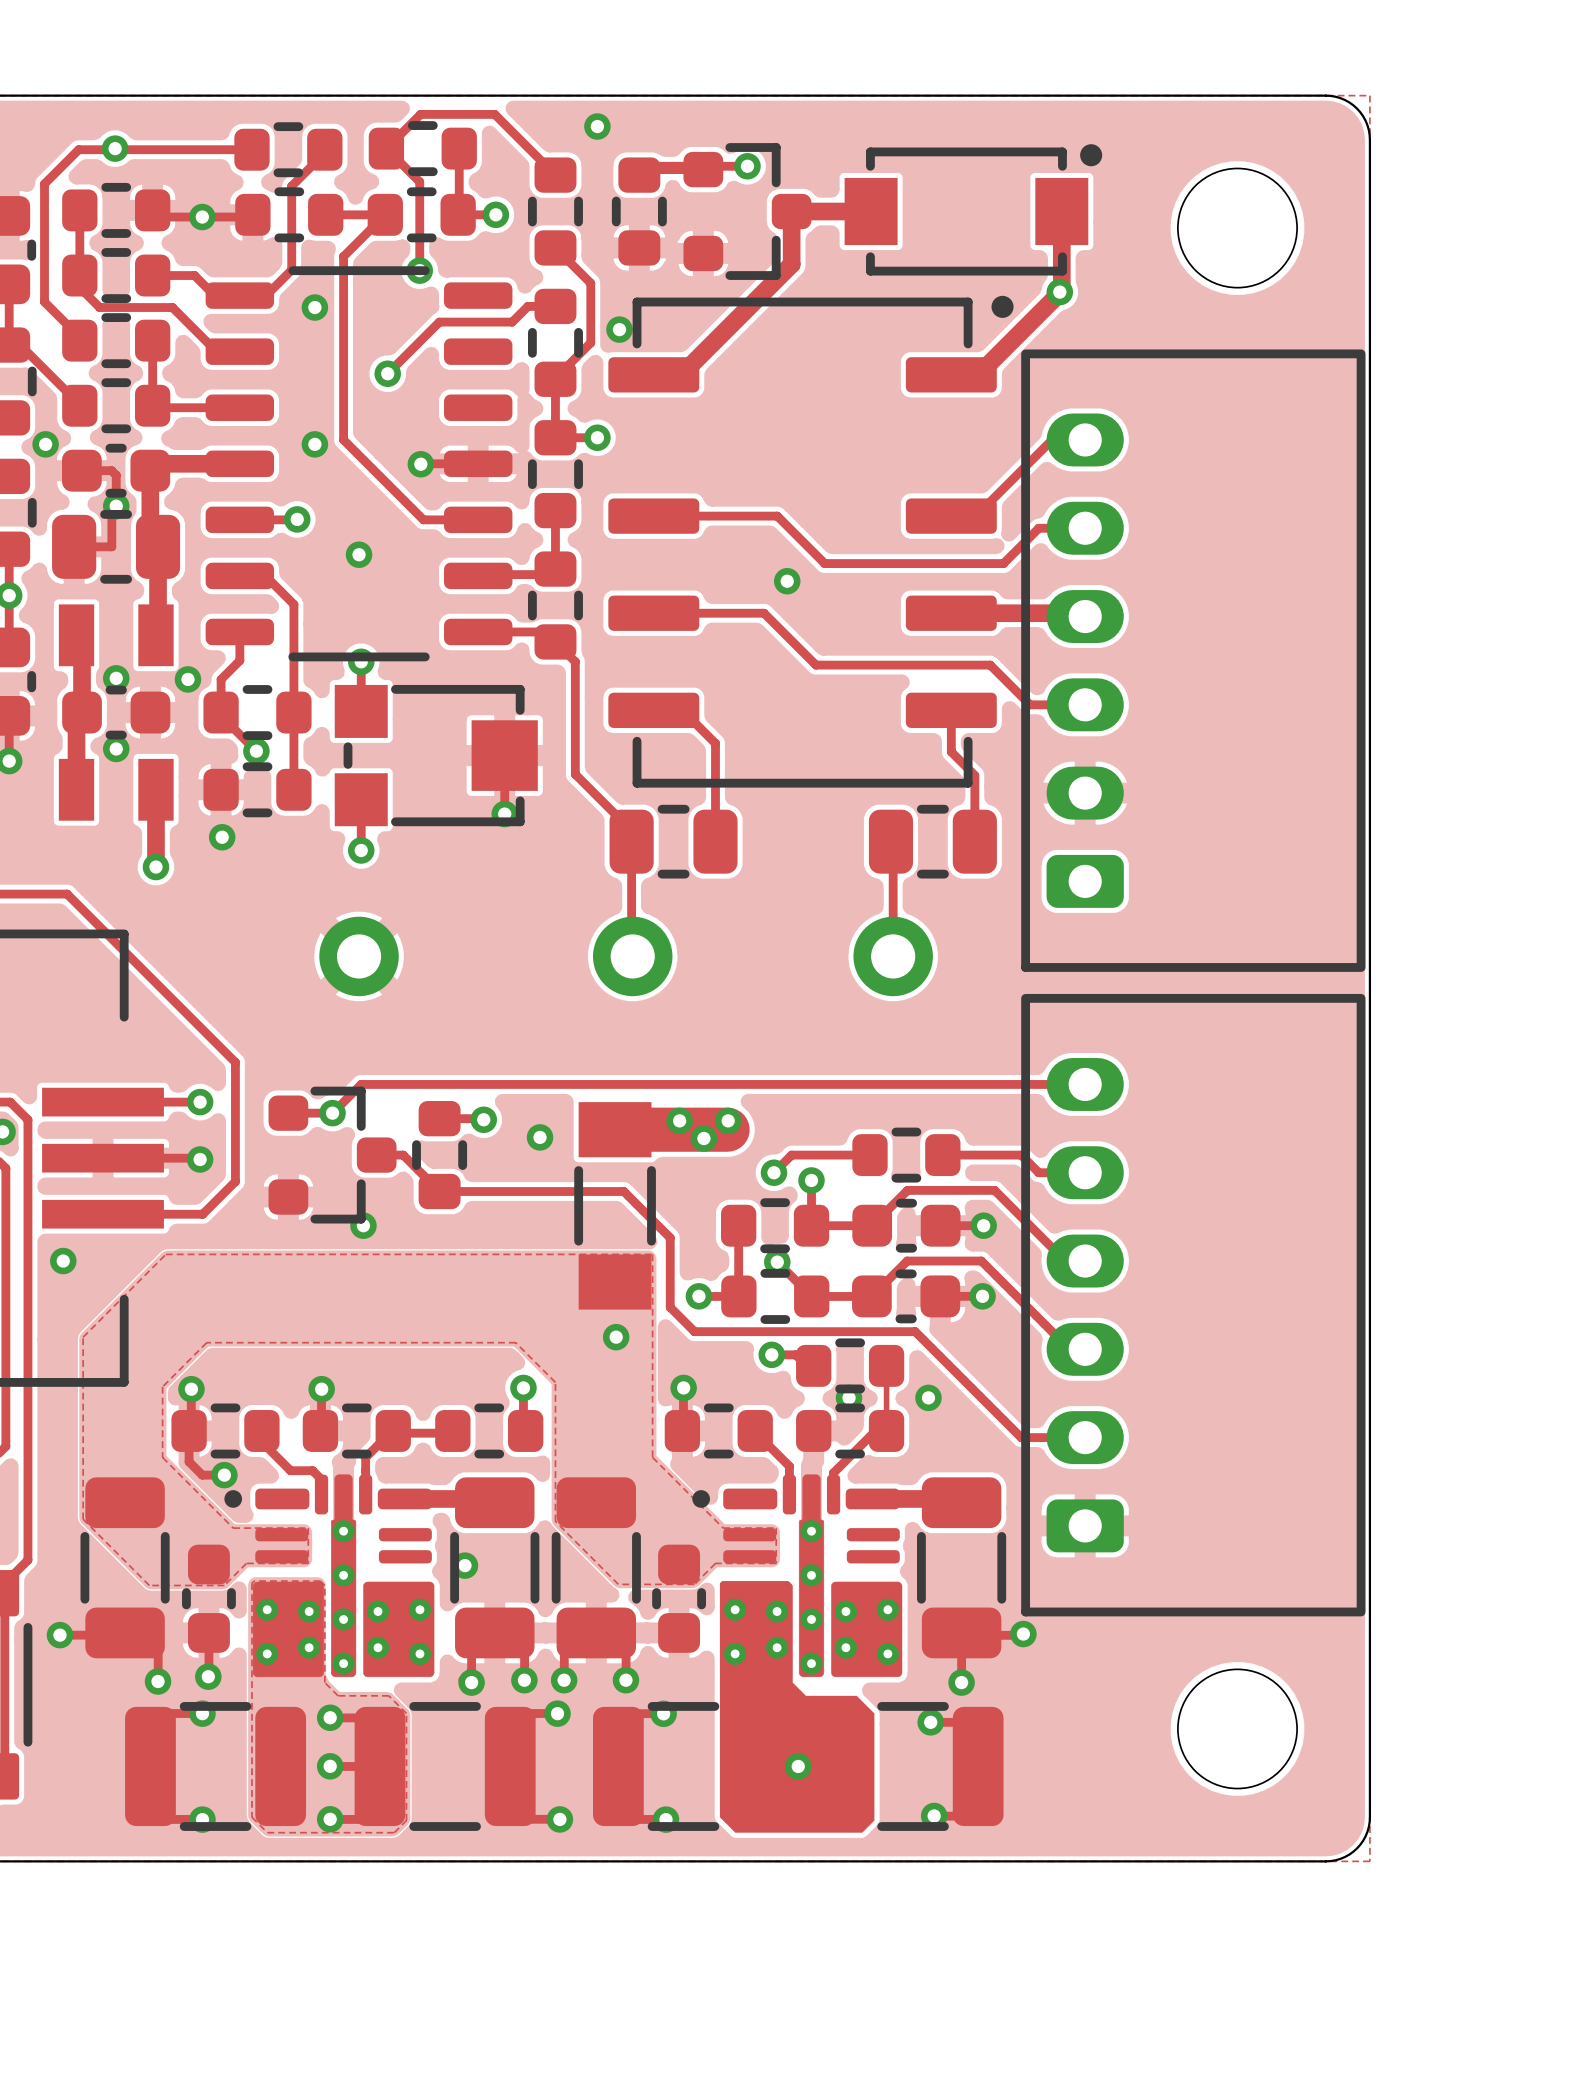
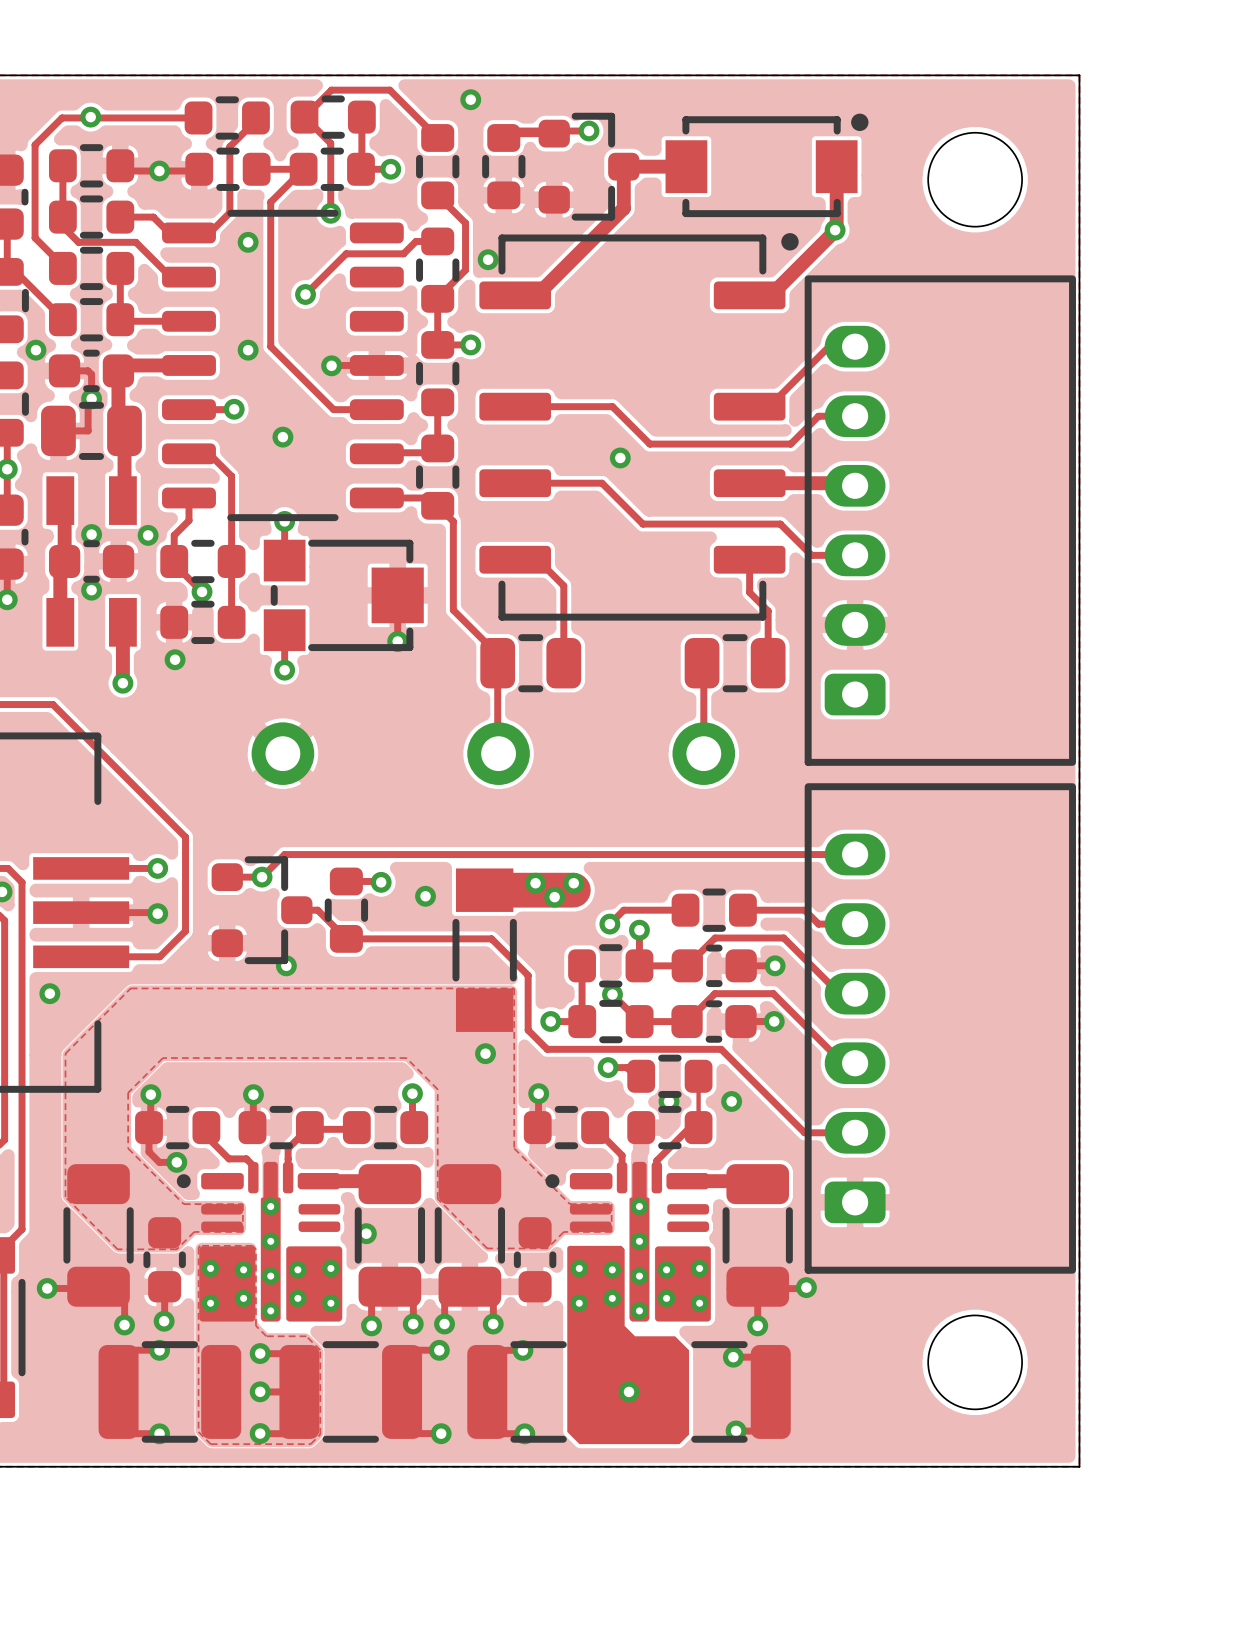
board edge: (1325, 95) (1340, 98) (1356, 108) (1367, 125) (1369, 139) -> (1044, 75) (1079, 75) (1079, 110)
board edge: (1369, 1817) (1367, 1831) (1356, 1848) (1344, 1857) (1325, 1861) -> (1079, 1431) (1079, 1466) (1044, 1466)

